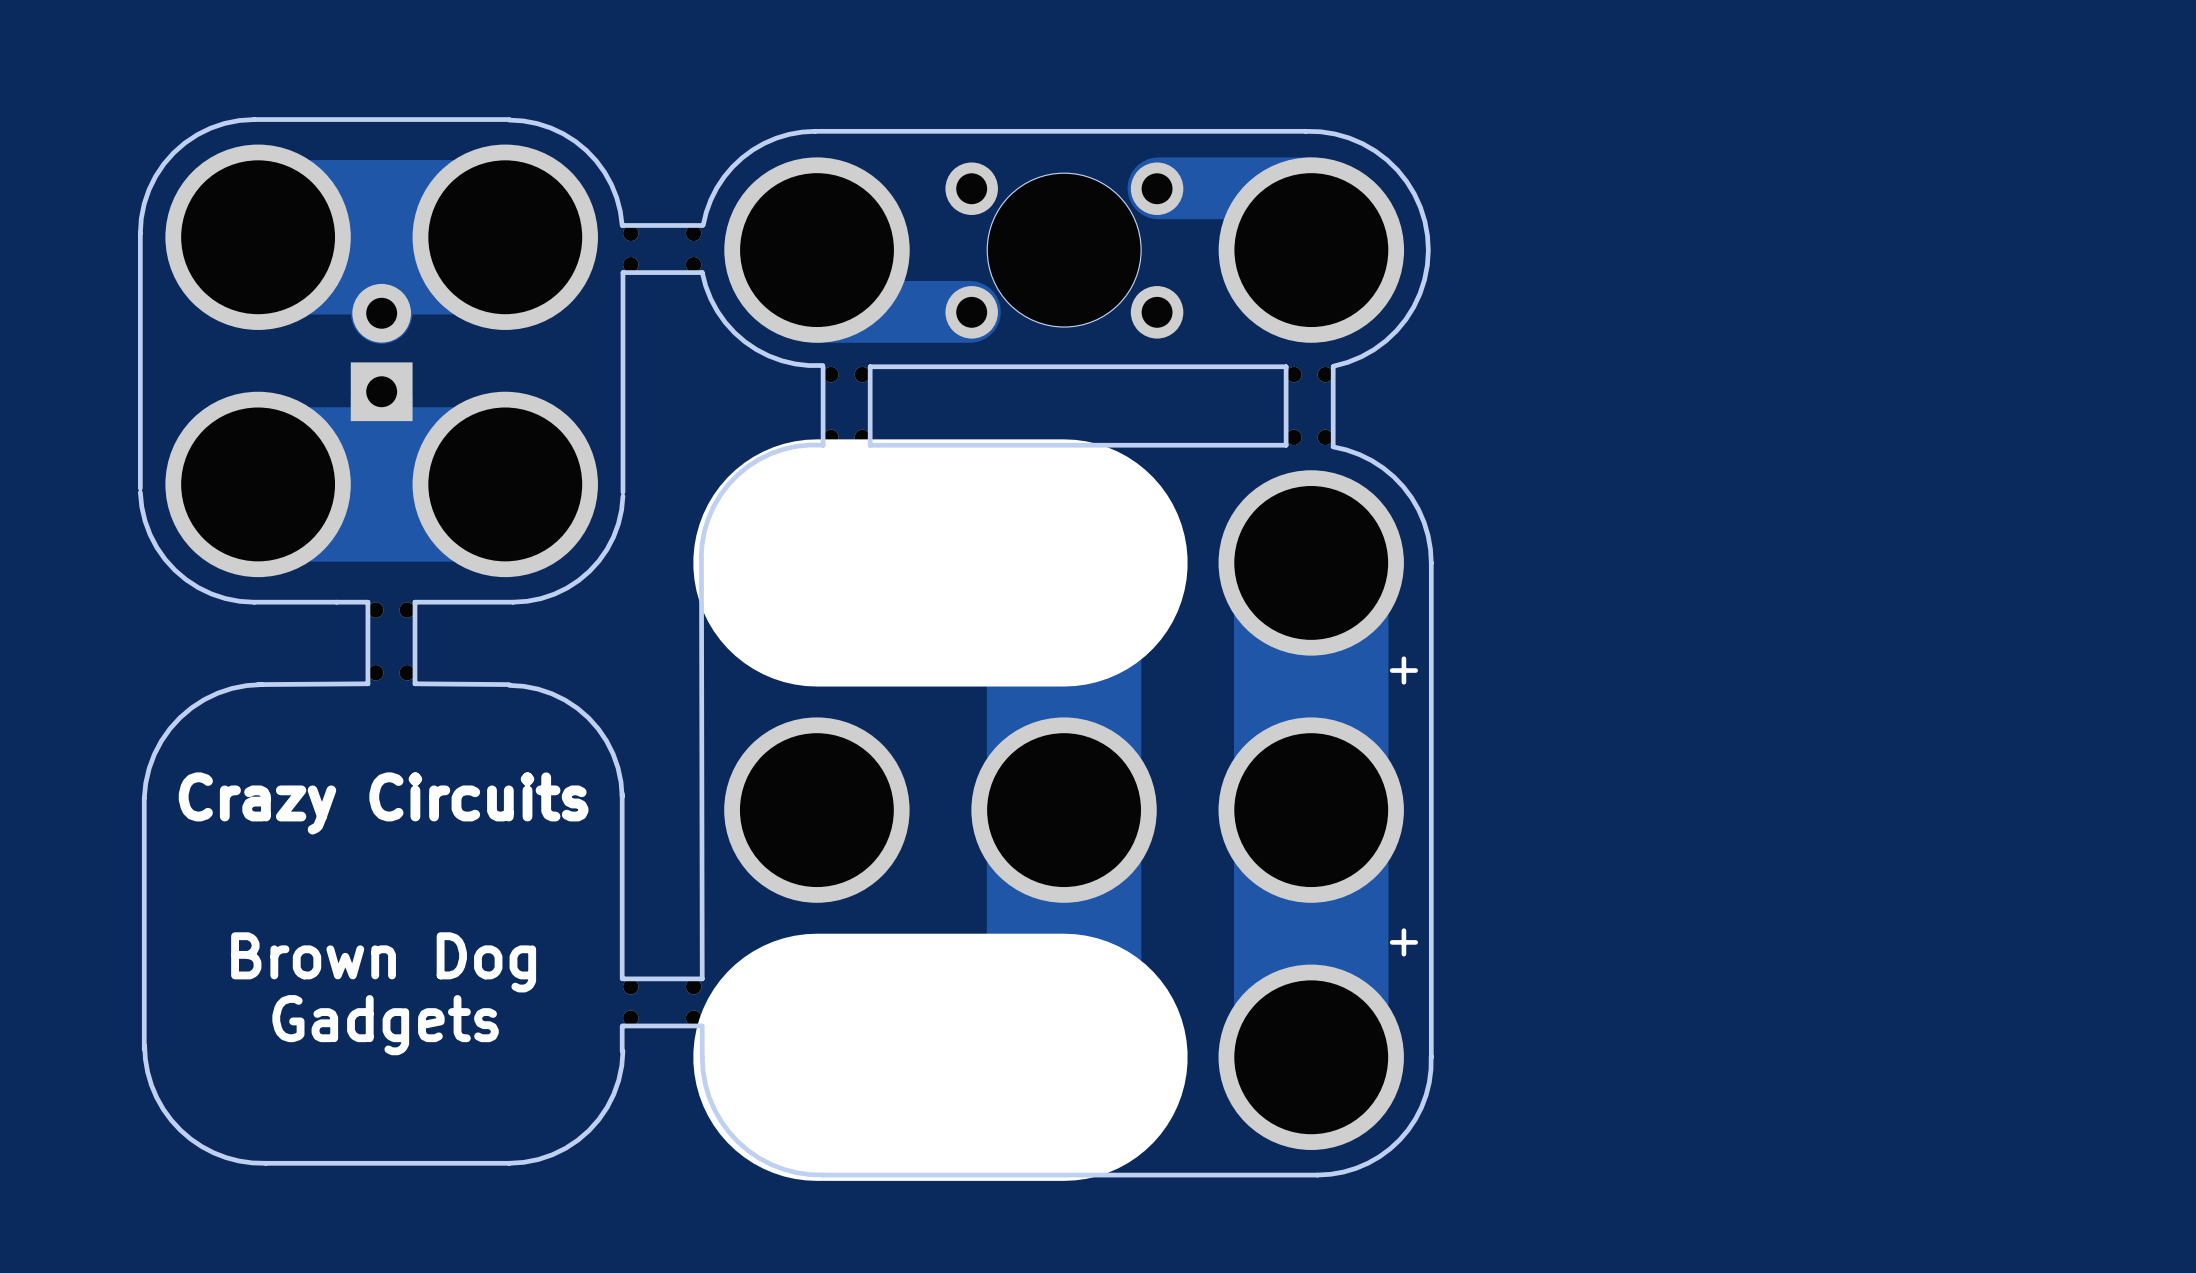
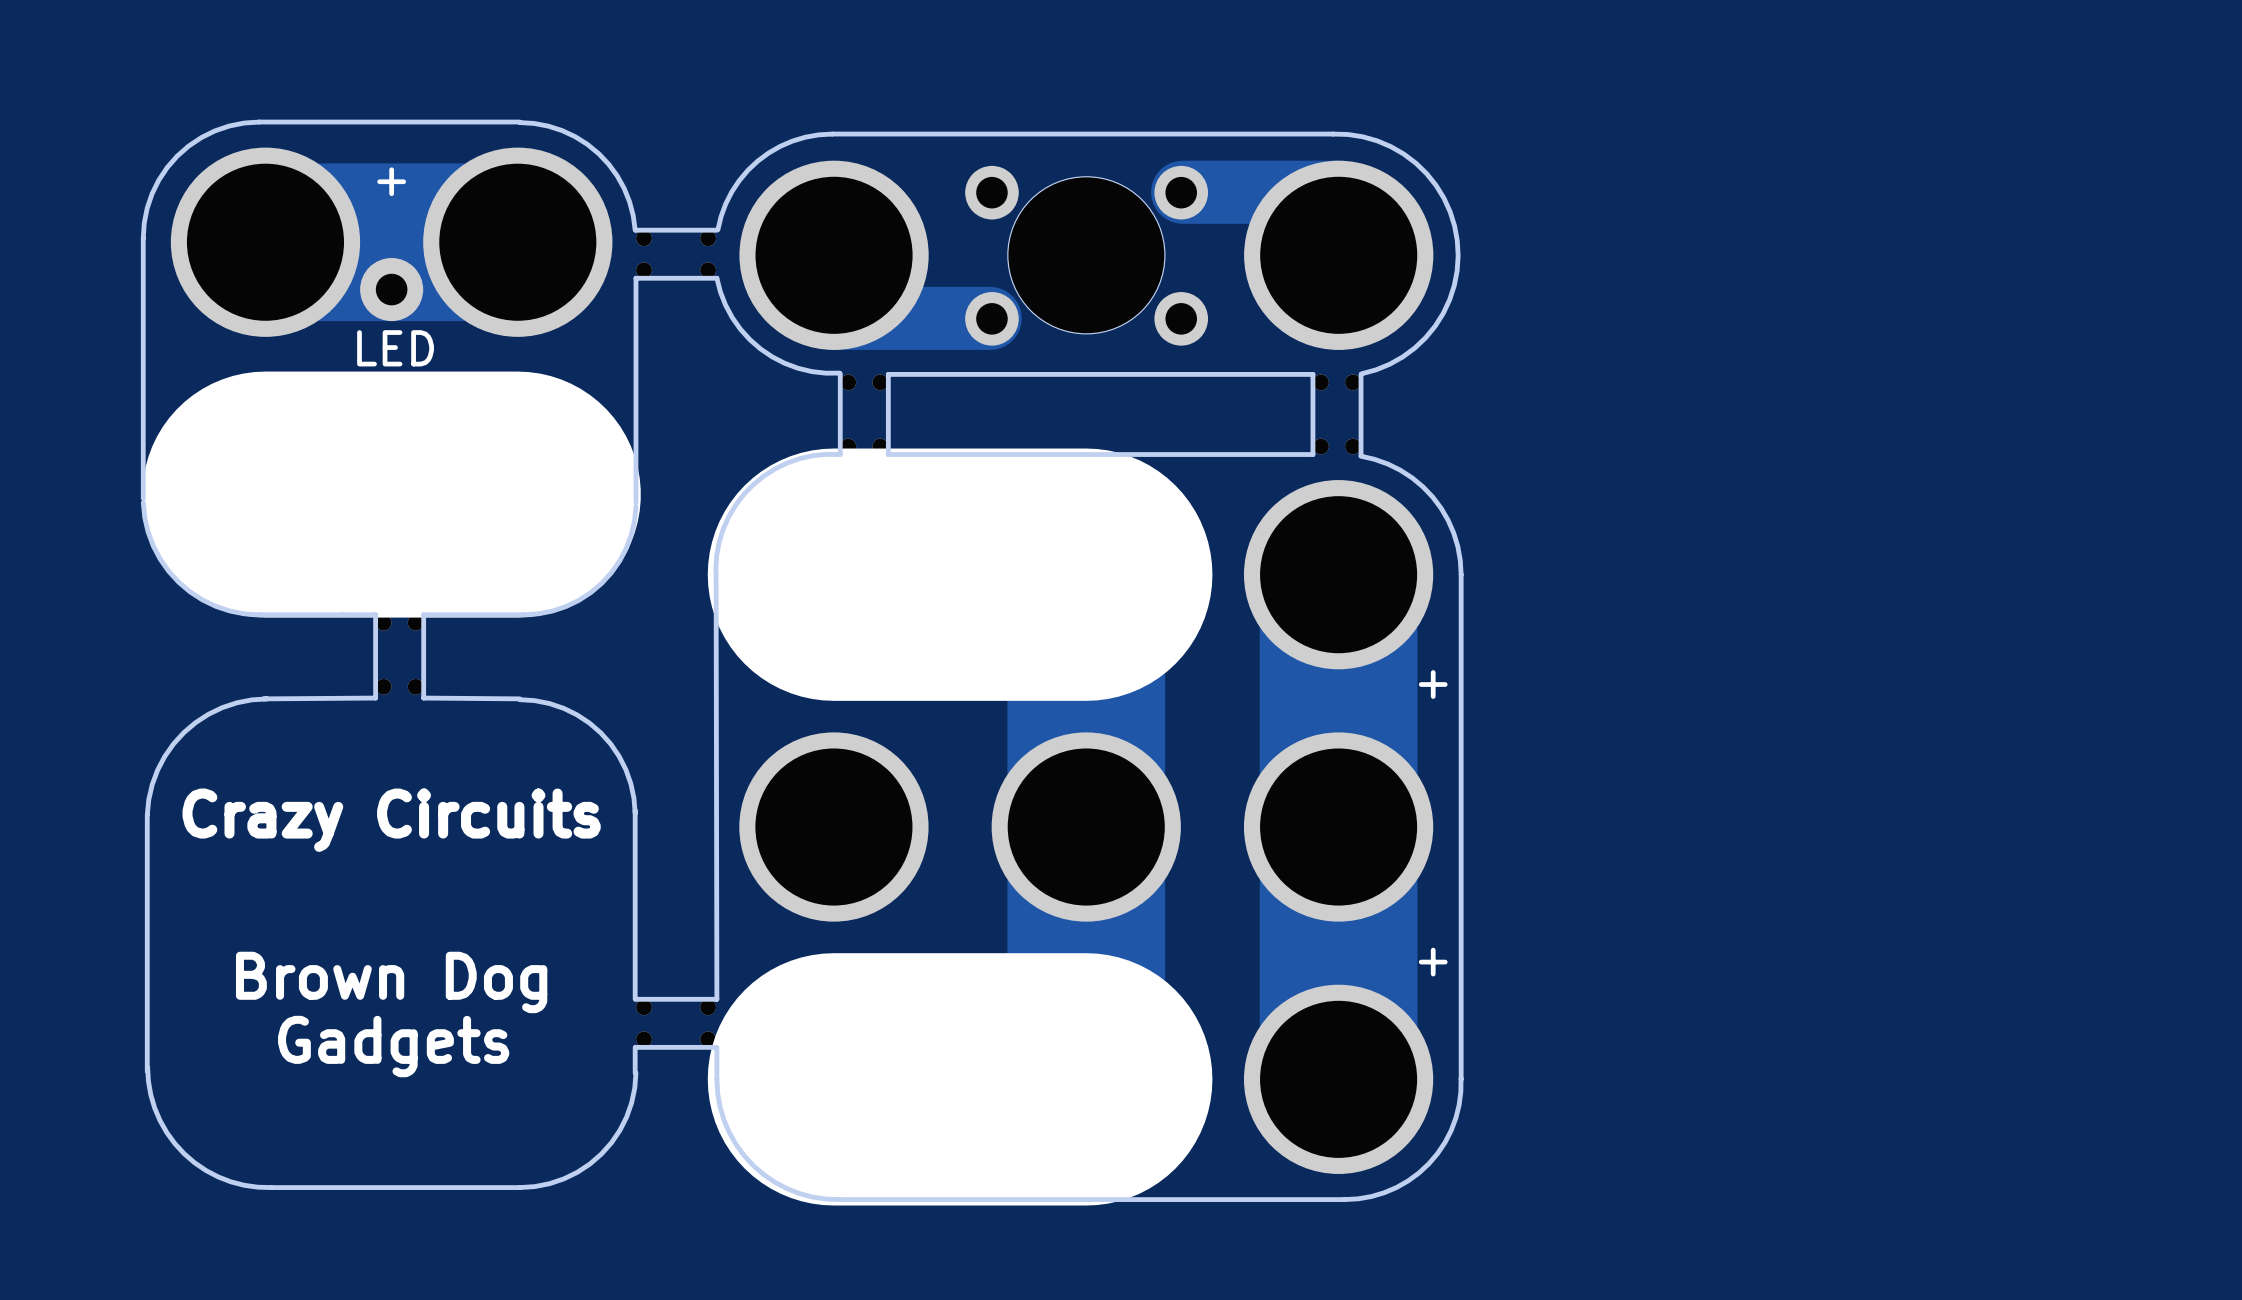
part: (381, 360) -> none
LED: none -> (391, 382)

